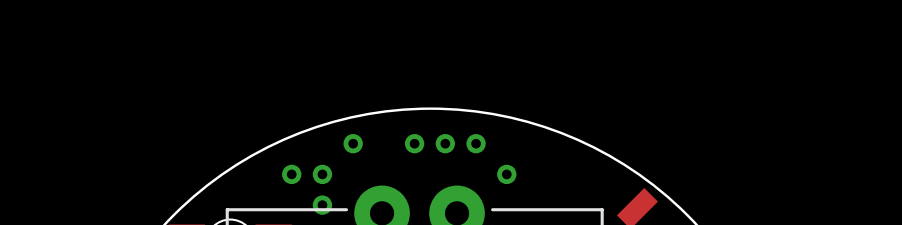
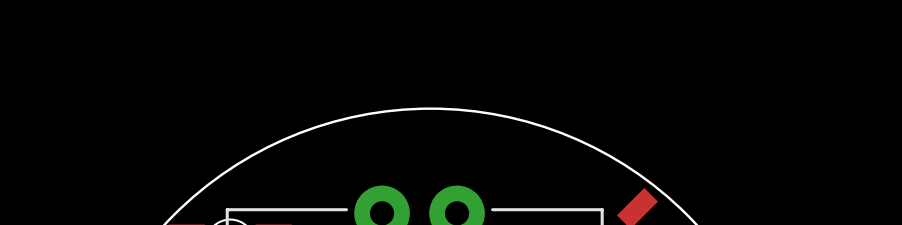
via: (353, 143) -> none
via: (414, 143) -> none
via: (445, 143) -> none
via: (476, 143) -> none
via: (291, 174) -> none
via: (322, 174) -> none
via: (506, 174) -> none
via: (322, 205) -> none

